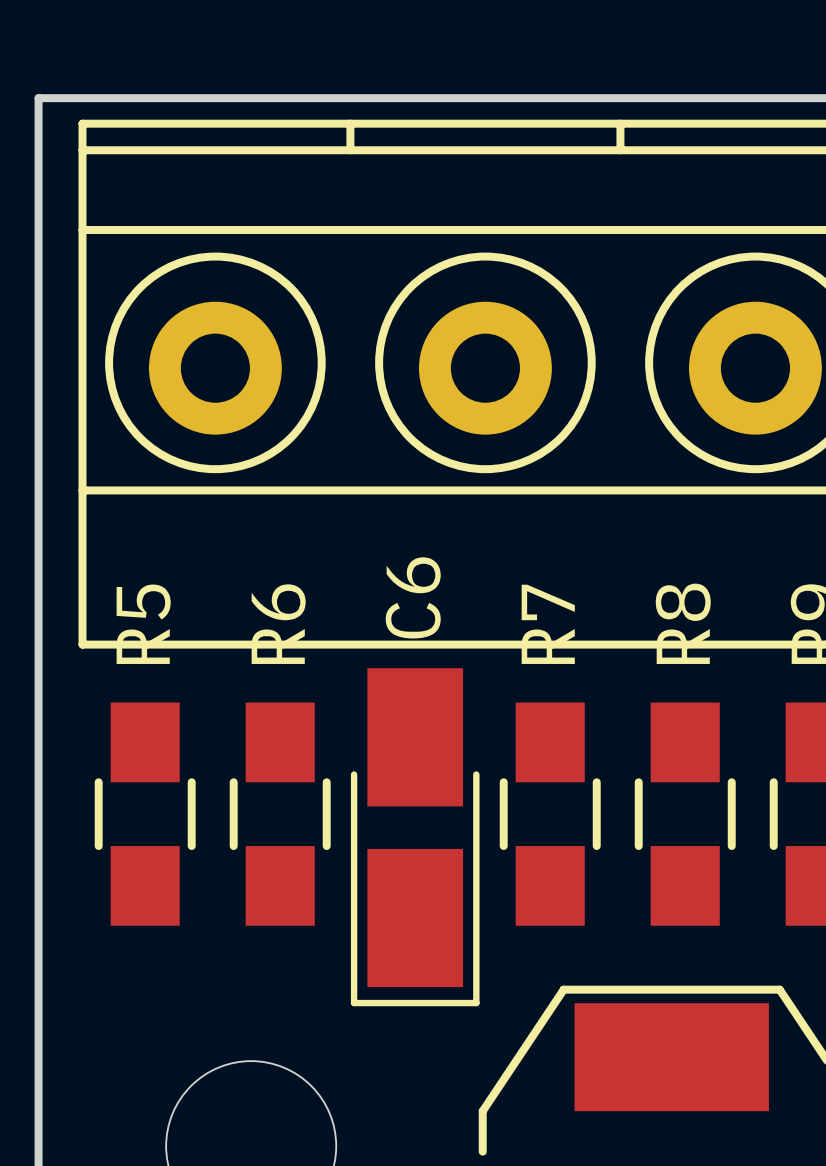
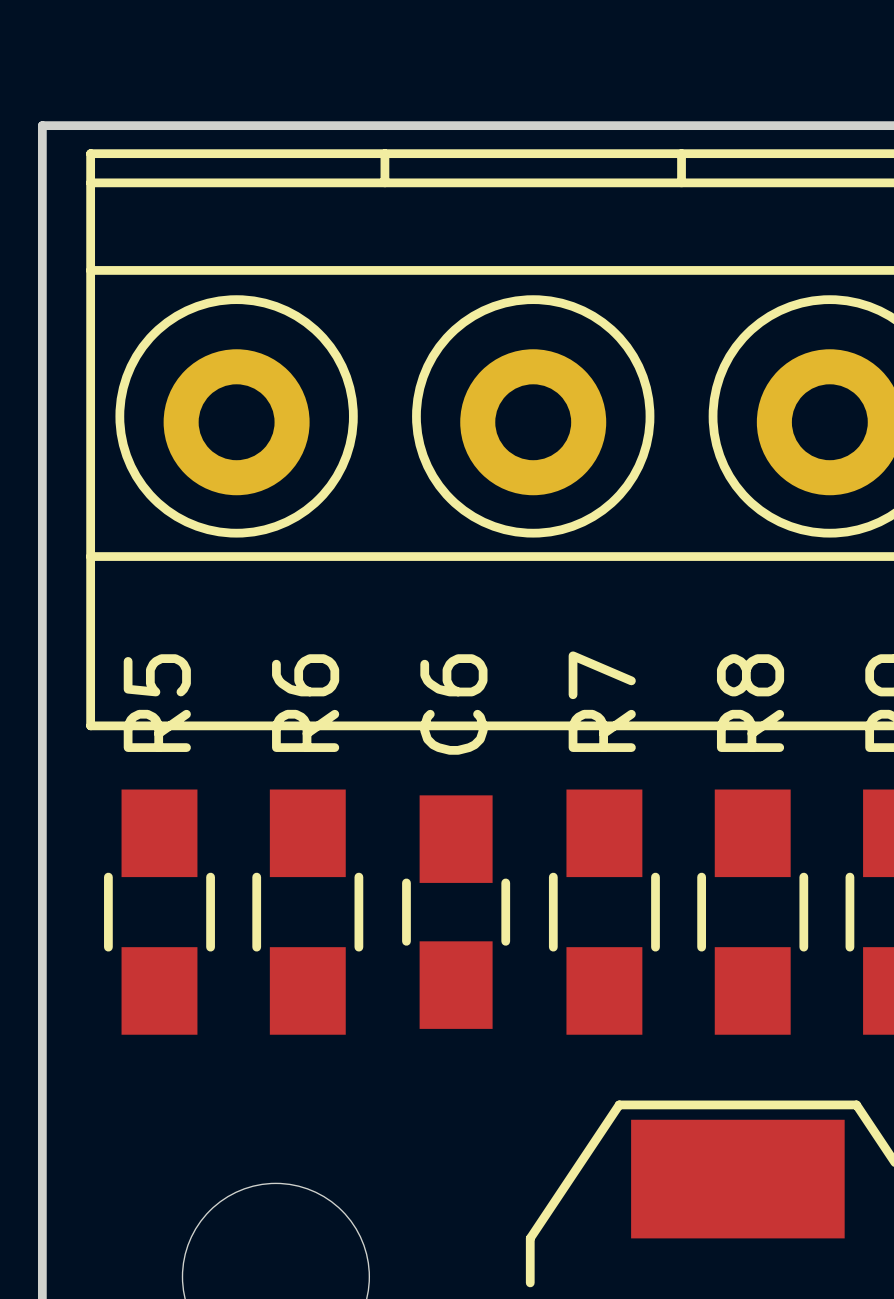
C6 footprint: [350, 668, 480, 1007] -> [402, 795, 511, 1029]

